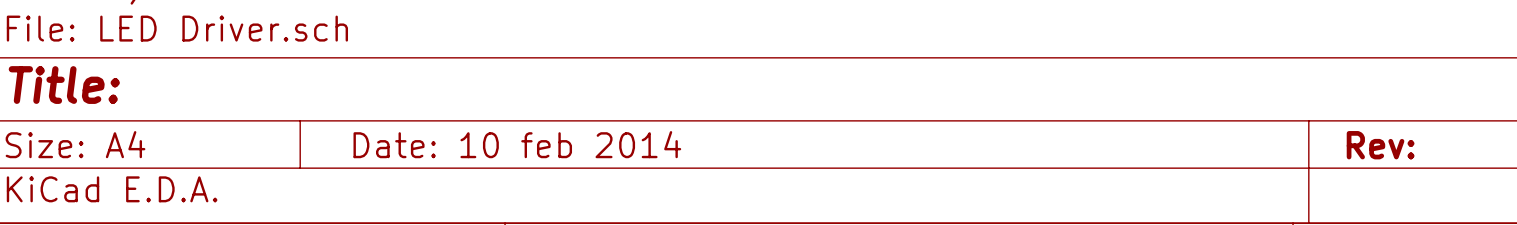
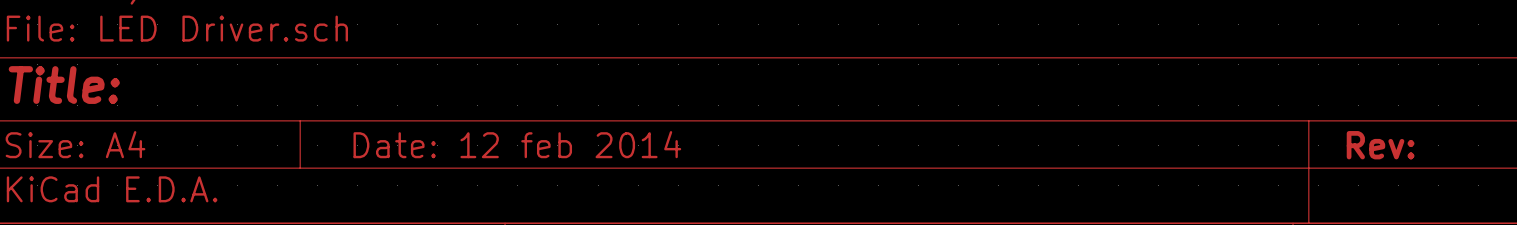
title block: Date: 10 feb 2014 (517, 144) -> Date: 12 feb 2014 (517, 144)

